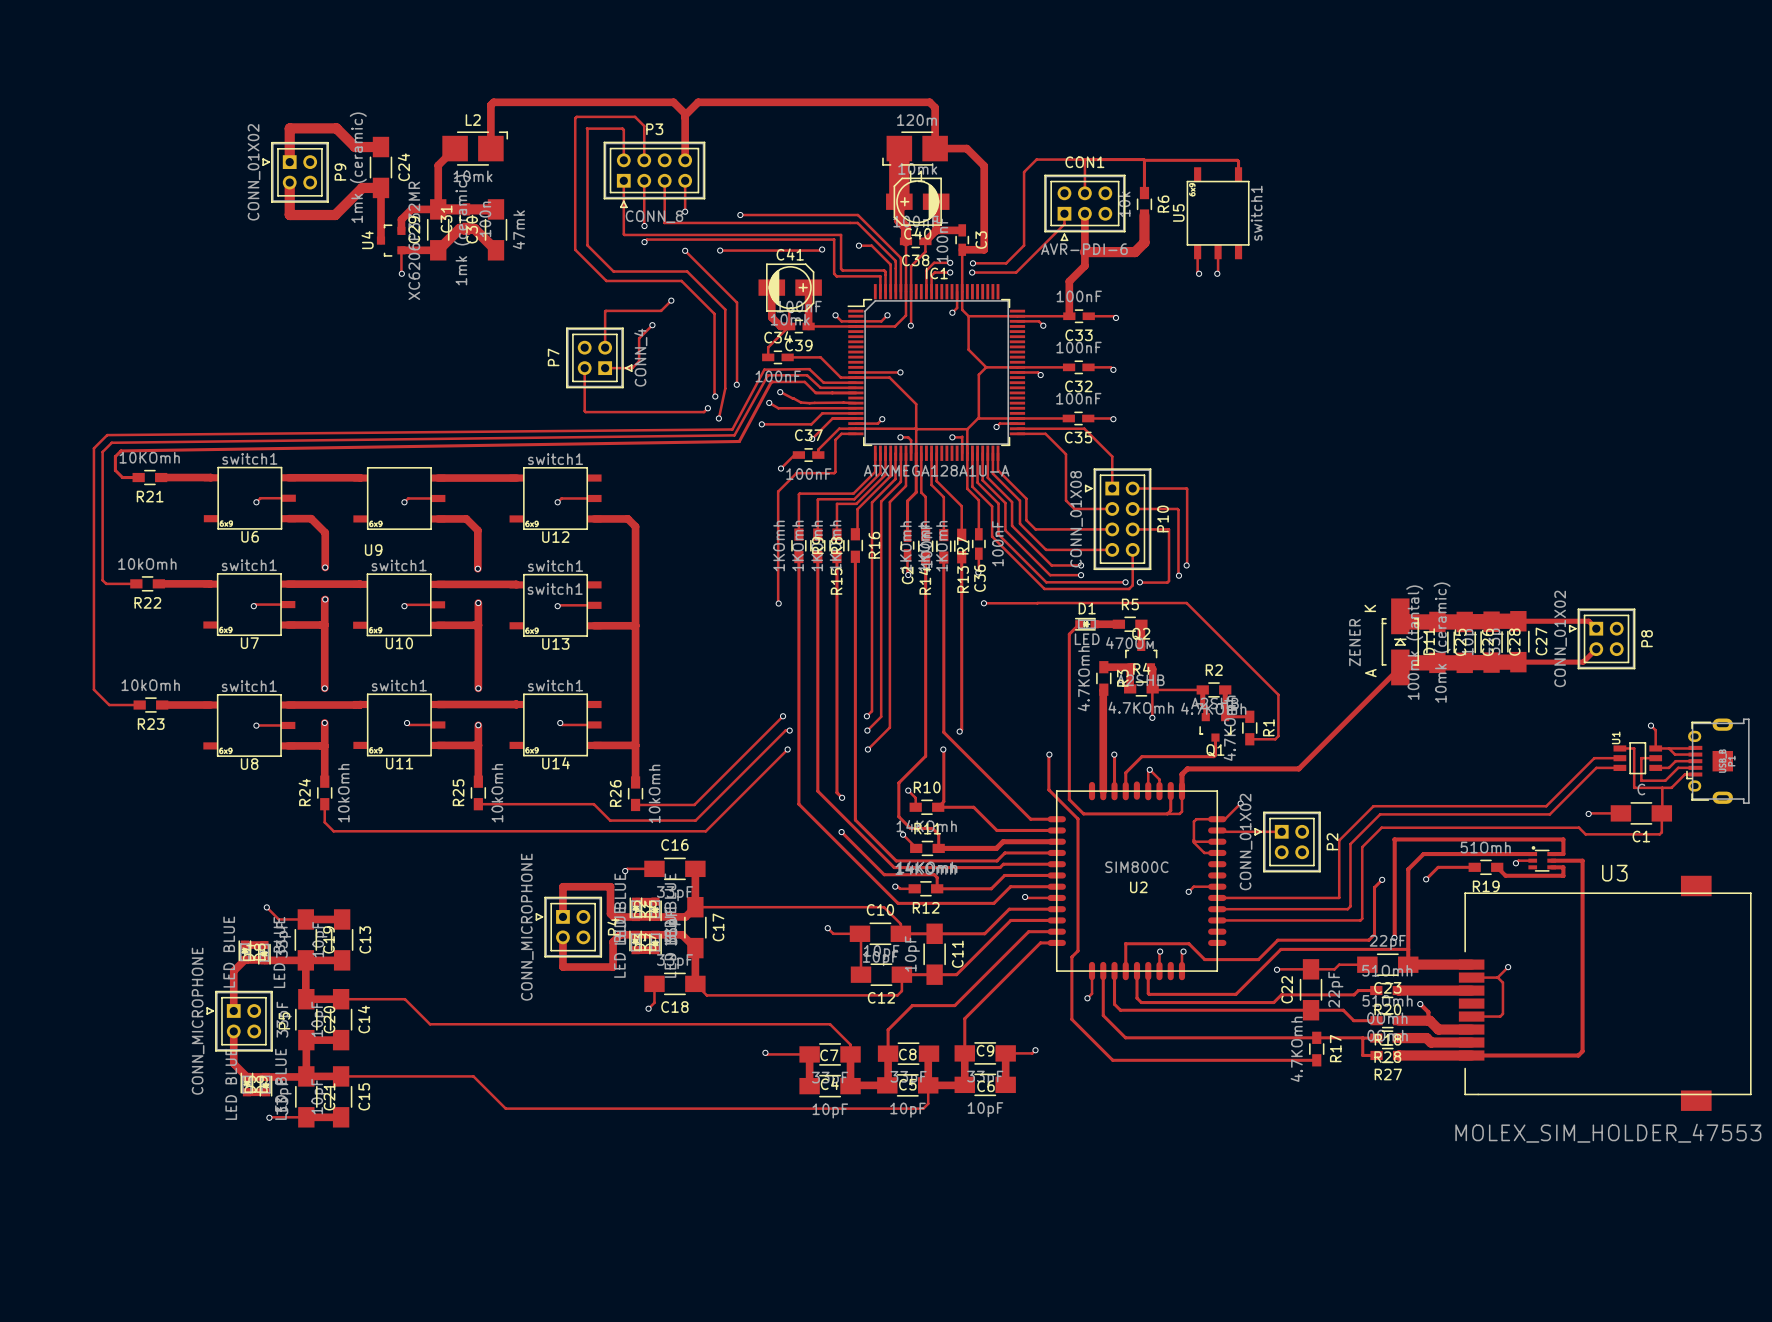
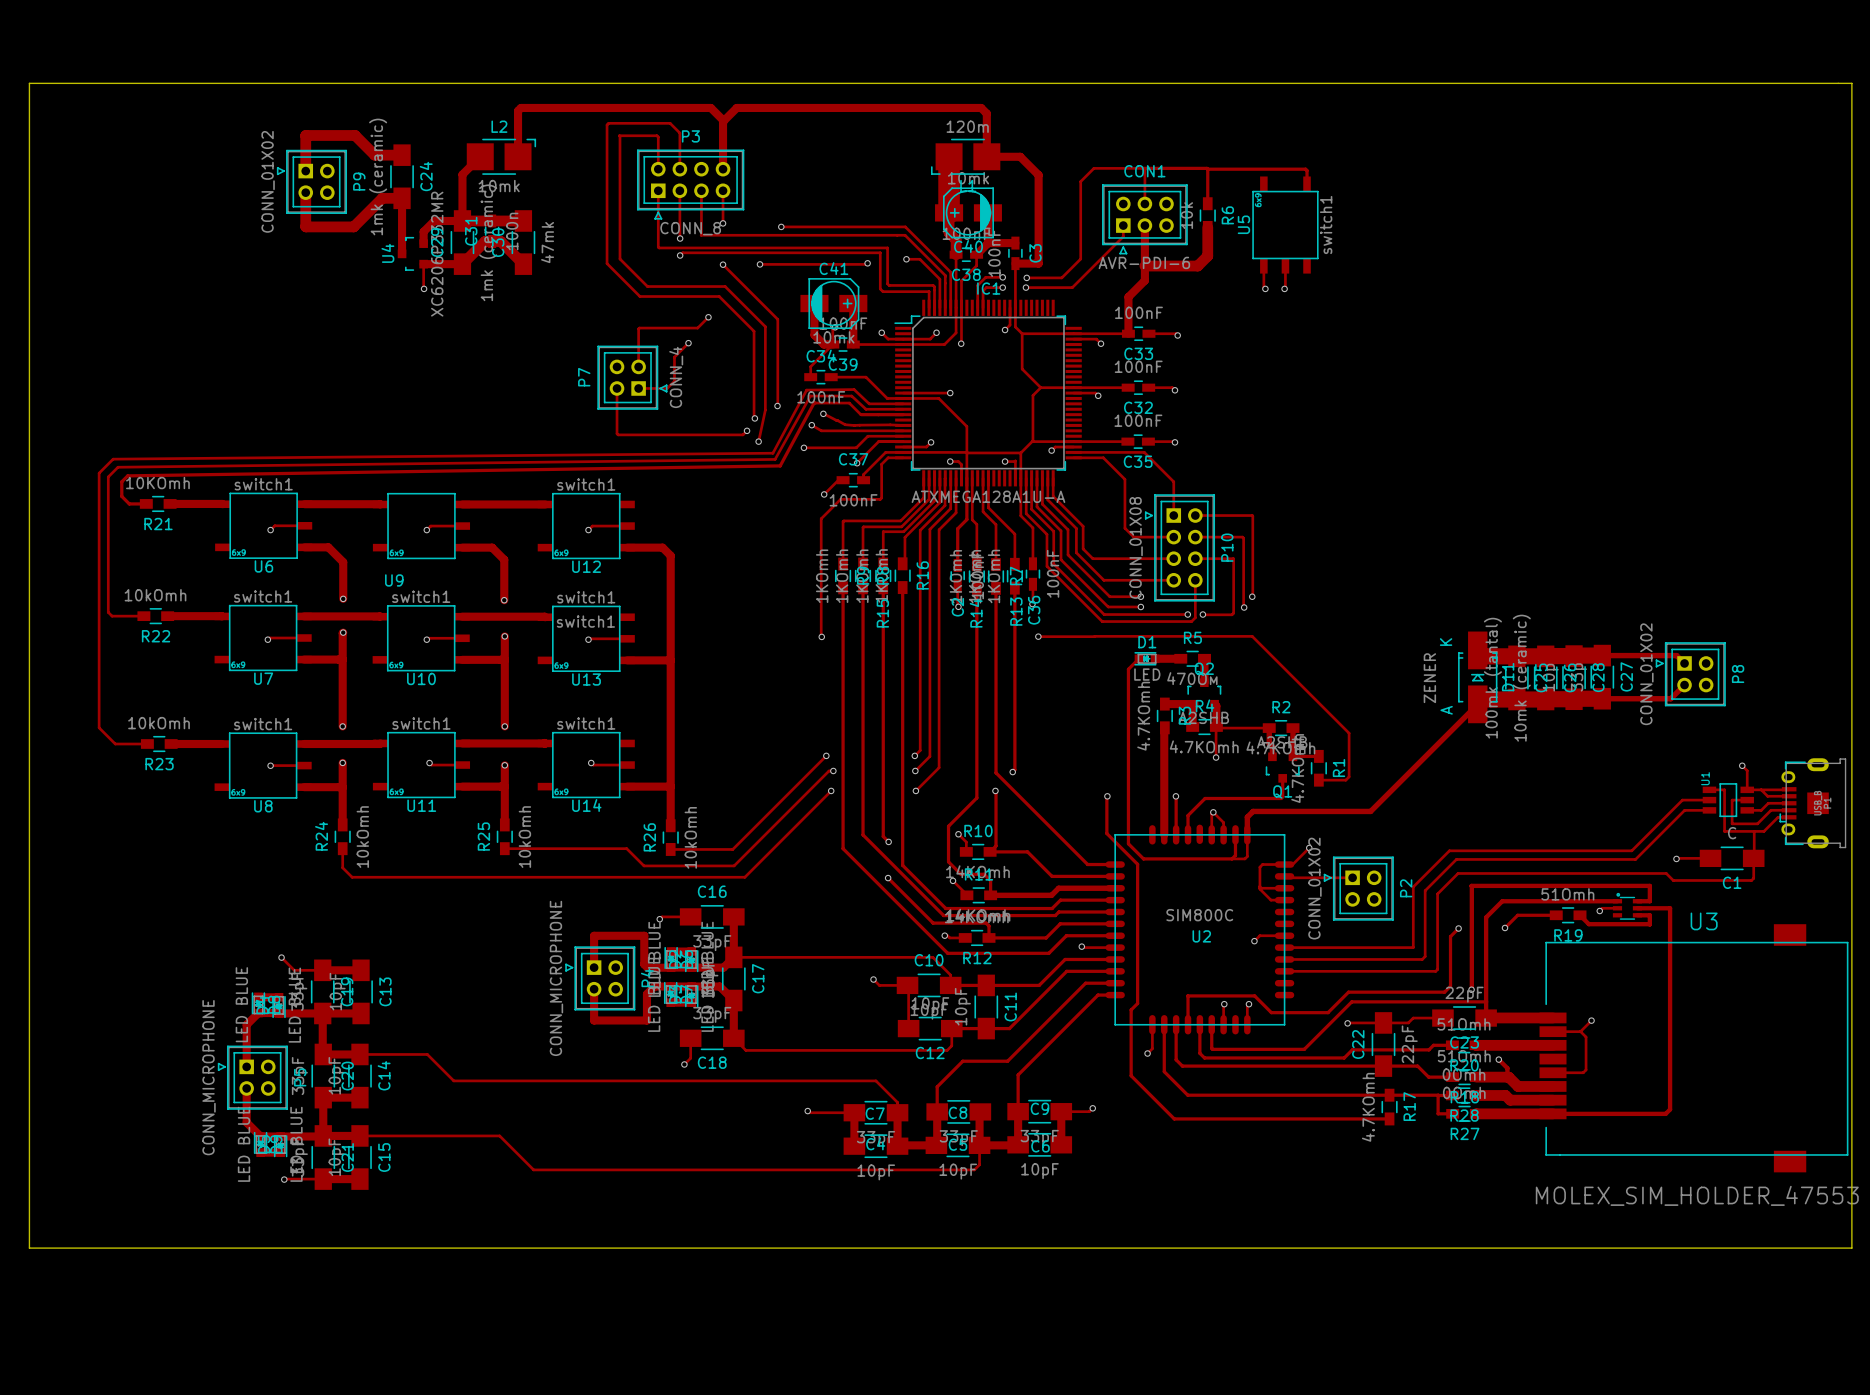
board edge: none -> (29, 83) (1851, 83) (1851, 1248) (29, 1248) (29, 83)

